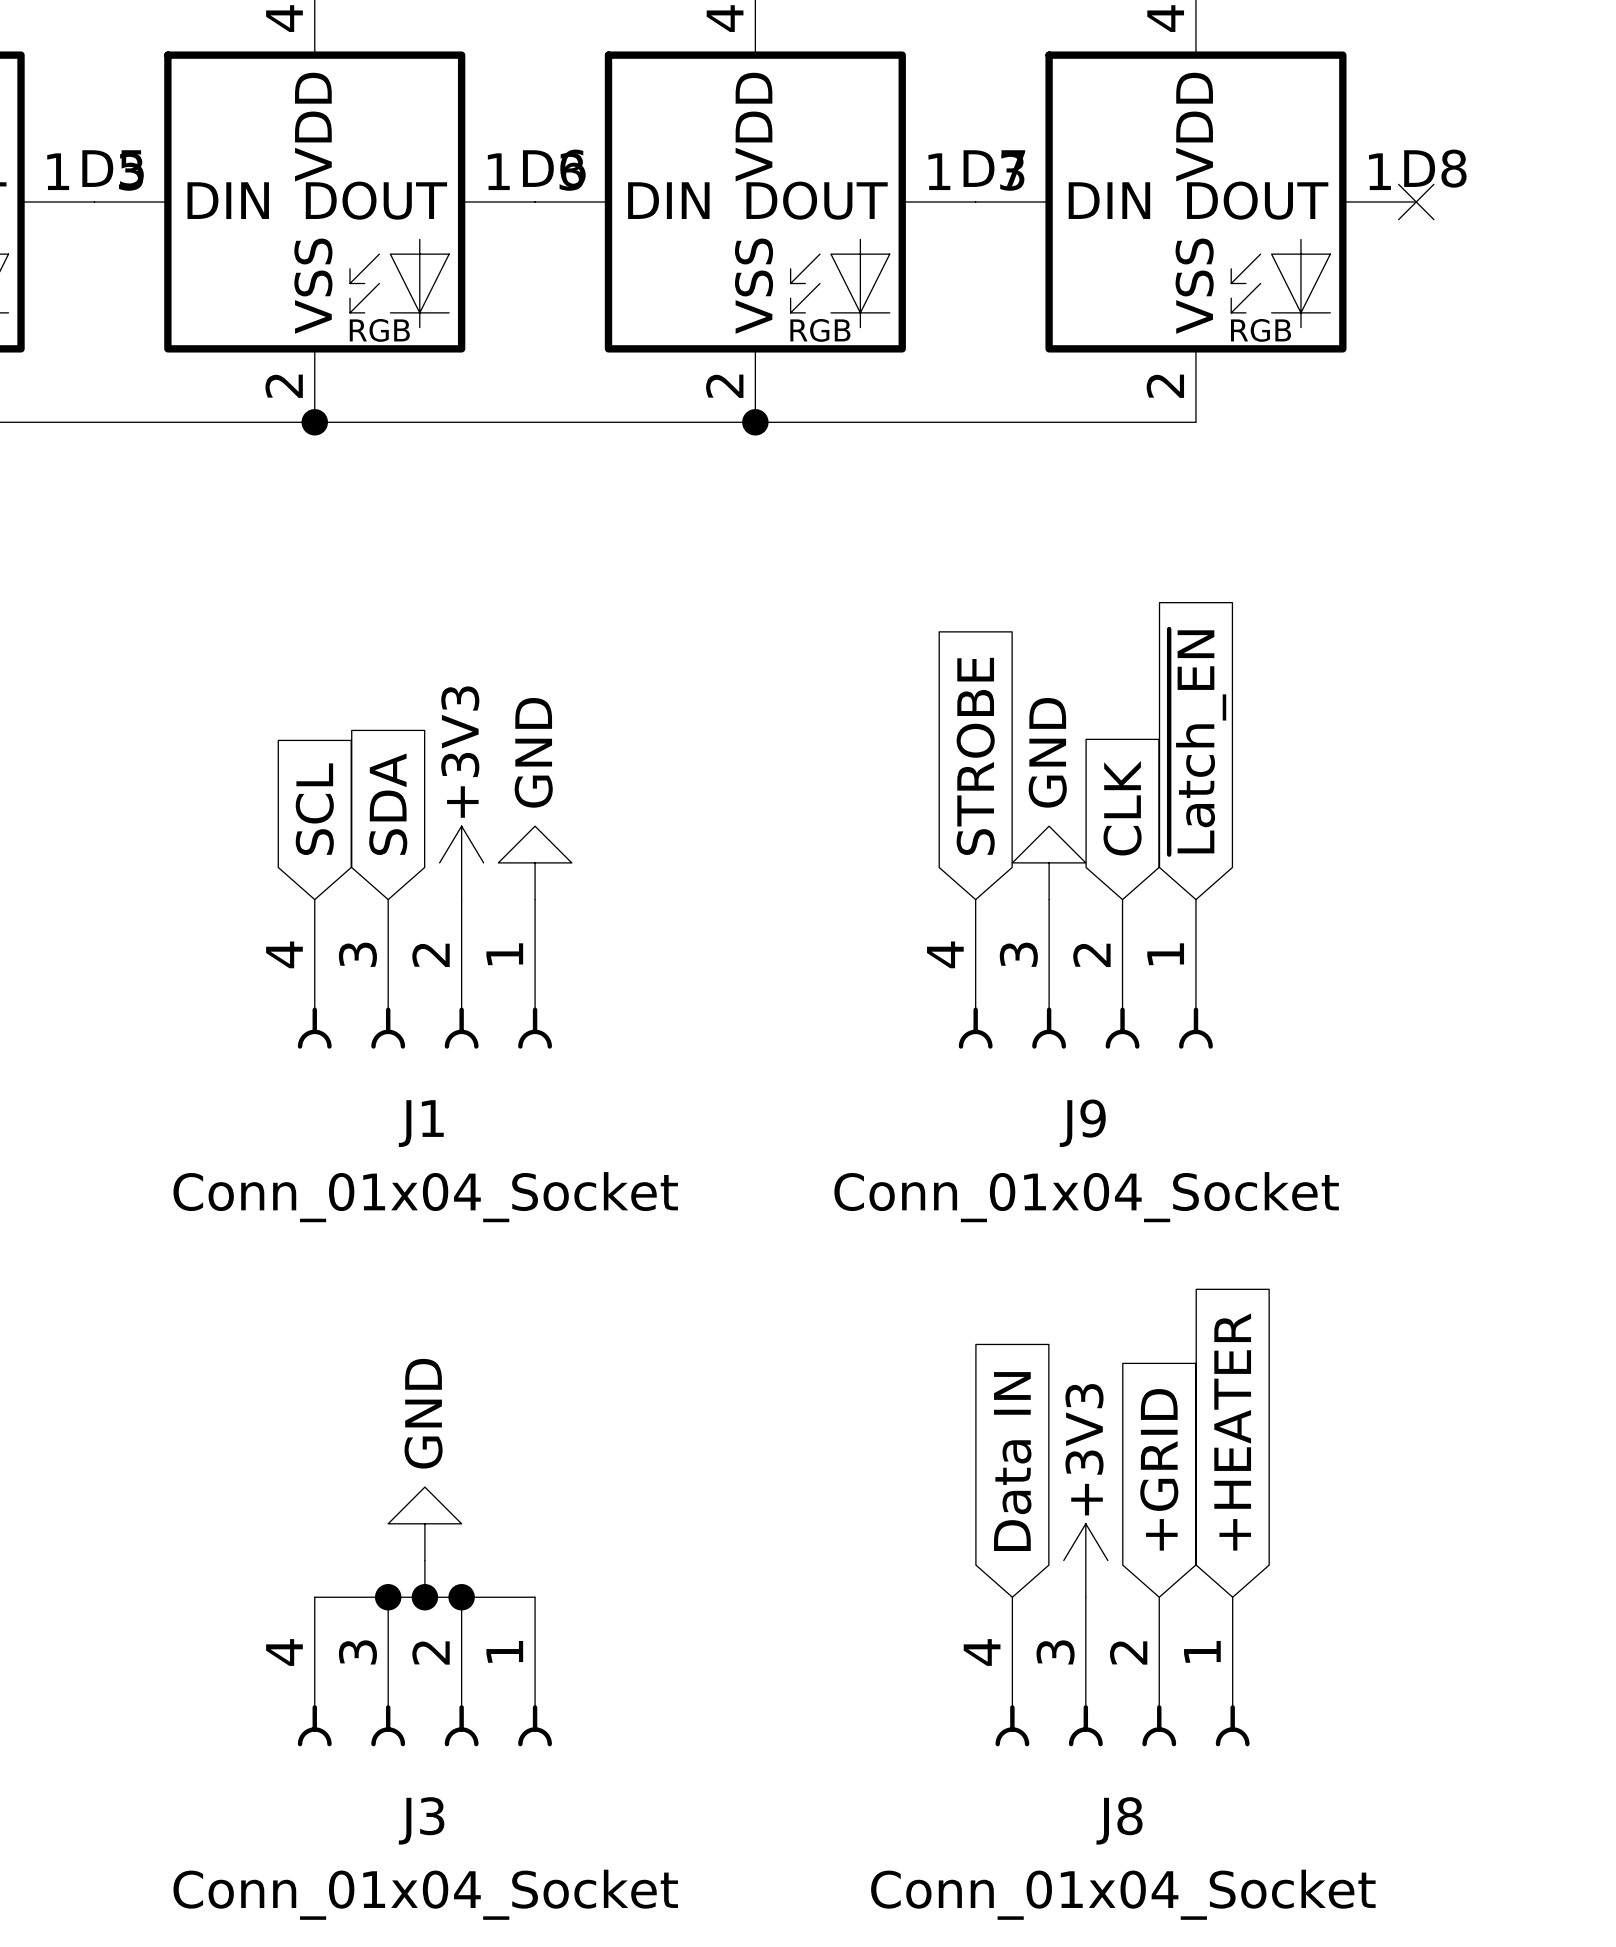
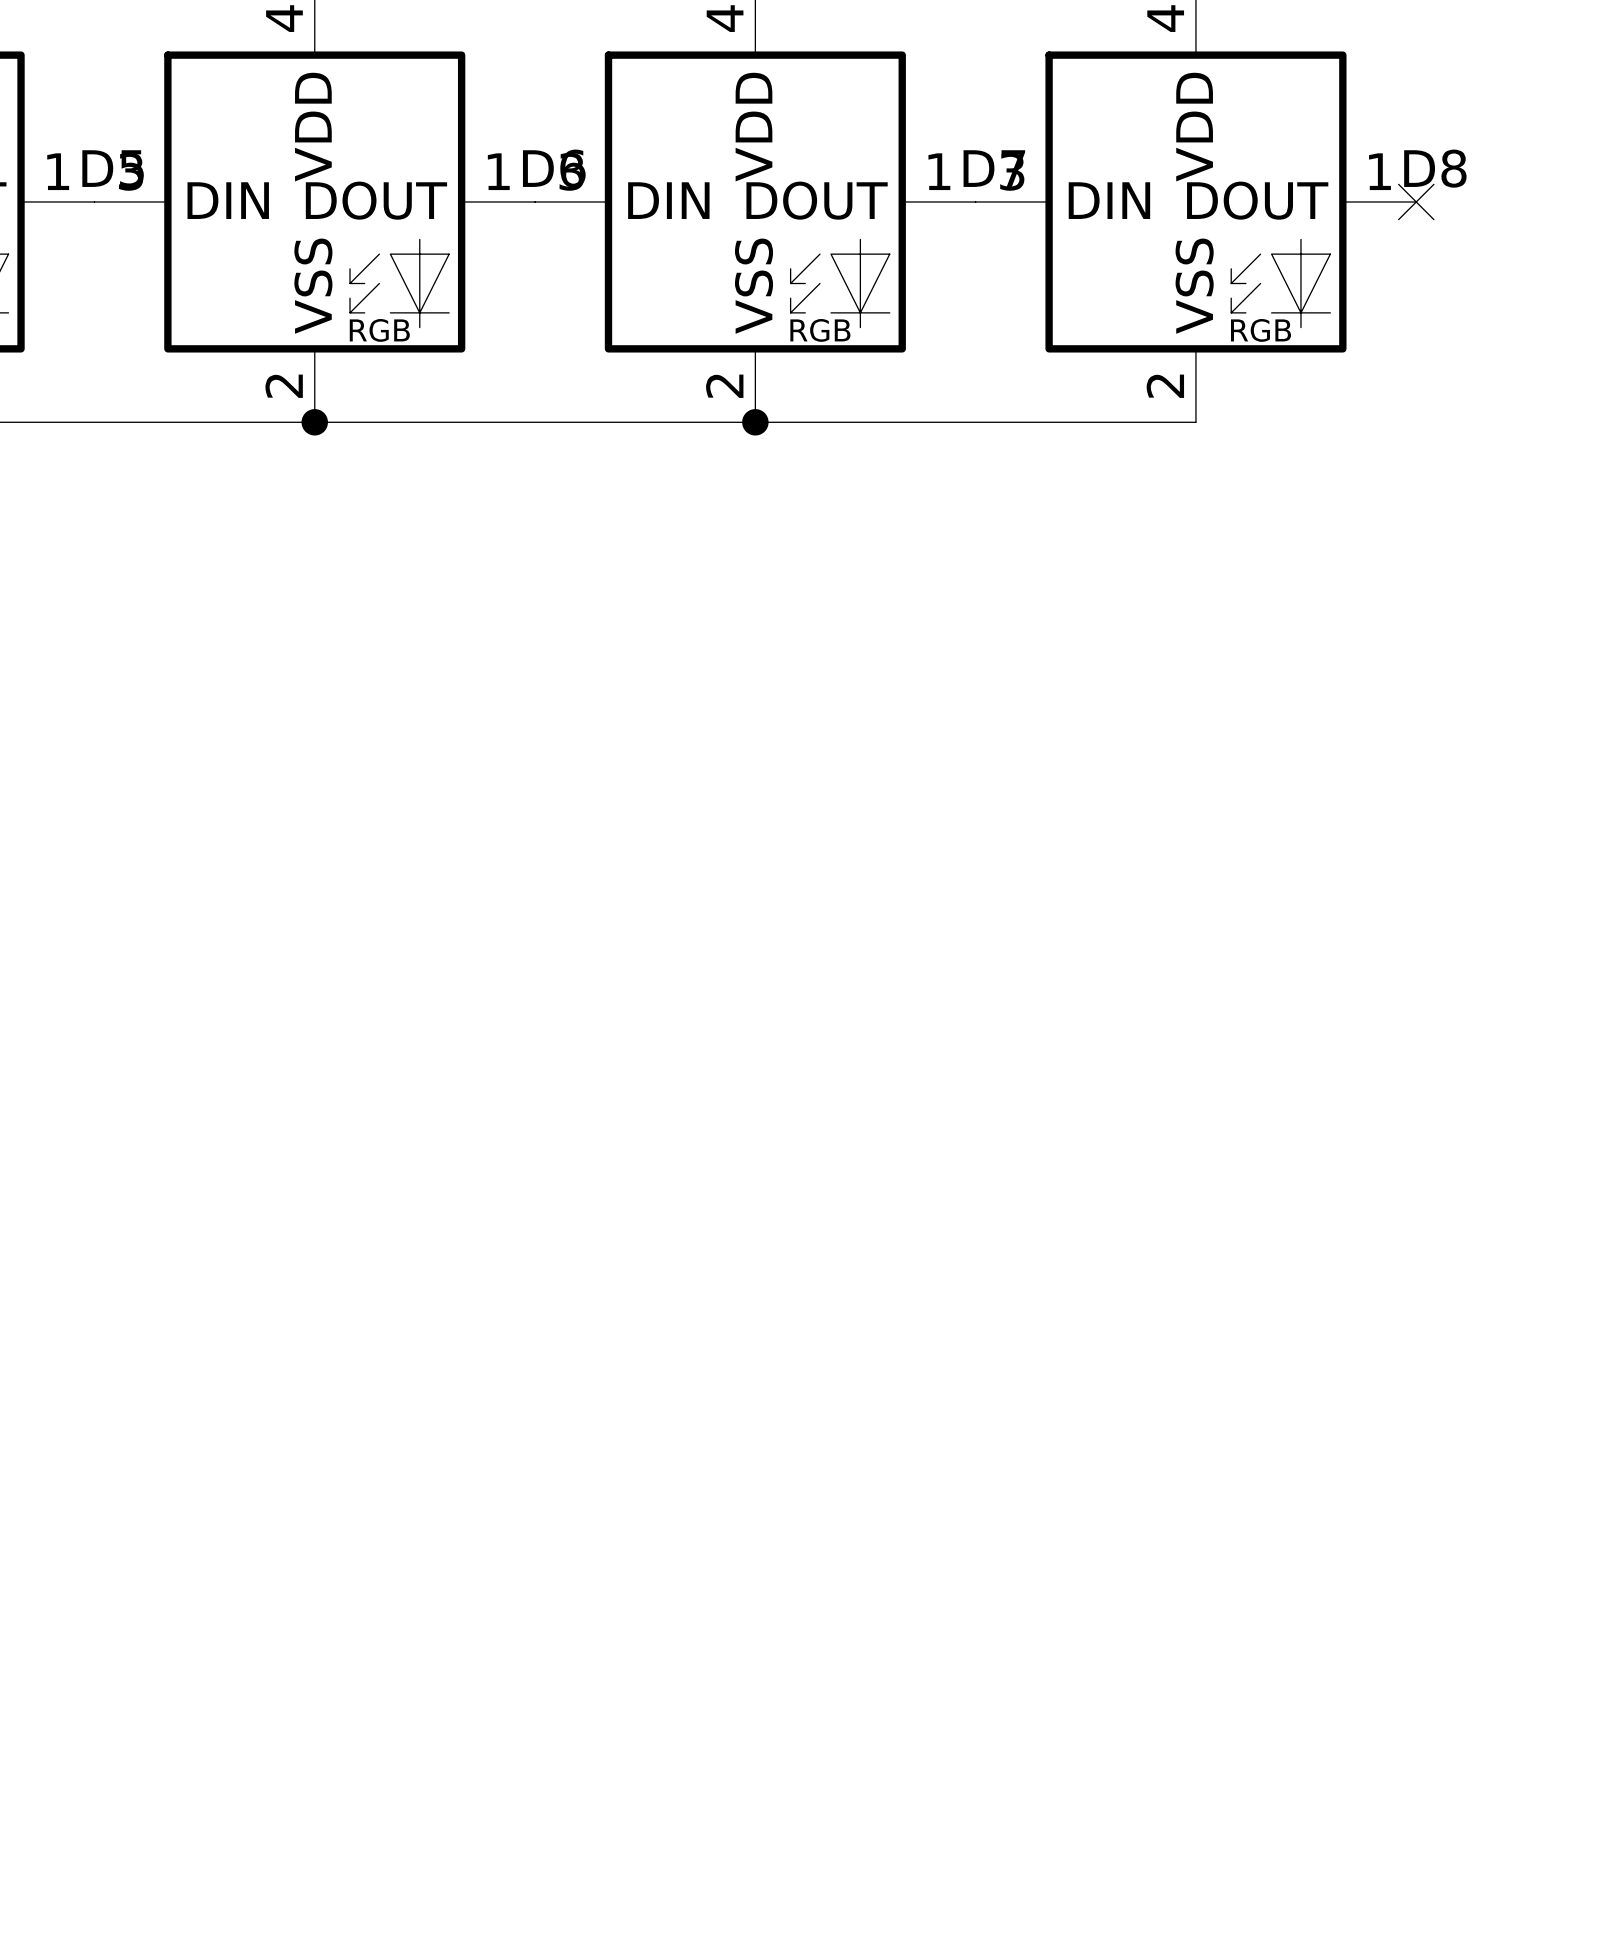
global label: ~{Latch_EN} (1197, 741) -> none
global label: STROBE (975, 756) -> none
global label: SDA (388, 804) -> none
global label: CLK (1122, 808) -> none
global label: SCL (314, 809) -> none
power symbol: +3V3 (461, 862) -> none
power symbol: GND (535, 862) -> none
power symbol: GND (1049, 862) -> none
J1: Conn_01x04_Socket (424, 974) -> none
J9: Conn_01x04_Socket (1085, 974) -> none
global label: +HEATER (1232, 1432) -> none
global label: Data IN (1012, 1461) -> none
global label: +GRID (1159, 1469) -> none
power symbol: GND (424, 1523) -> none
wire: (424, 1560) (424, 1597) -> none
power symbol: +3V3 (1085, 1560) -> none
wire: (314, 1597) (535, 1597) -> none
junction: (388, 1597) -> none
junction: (424, 1597) -> none
junction: (461, 1597) -> none
J3: Conn_01x04_Socket (424, 1671) -> none
J8: Conn_01x04_Socket (1122, 1671) -> none

